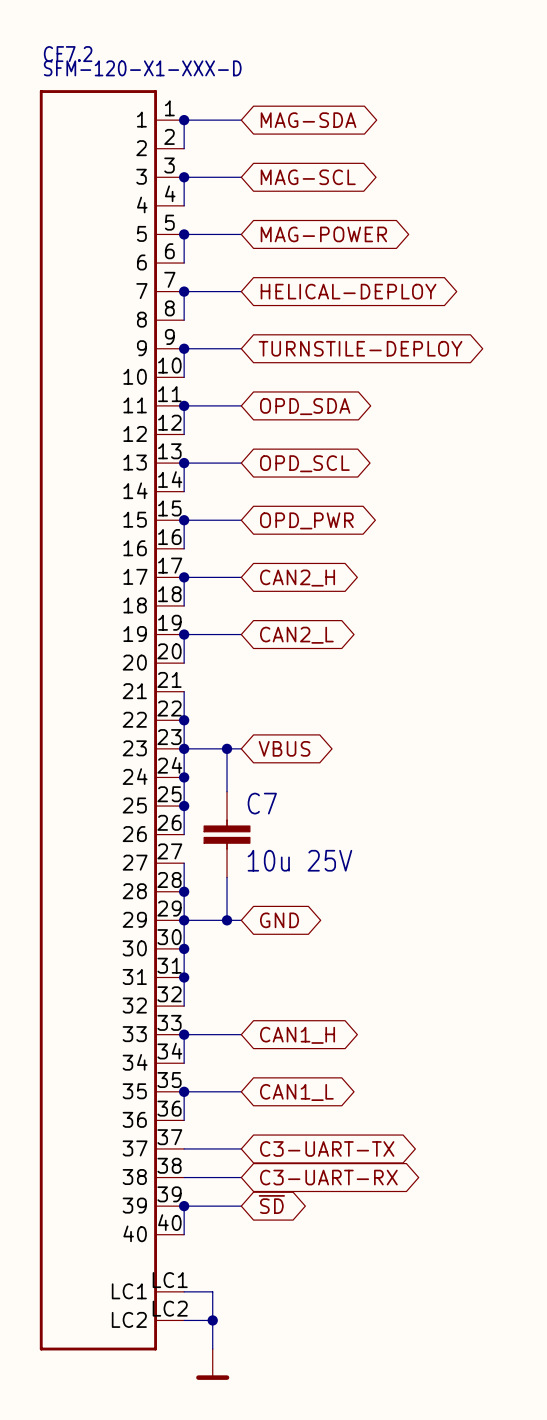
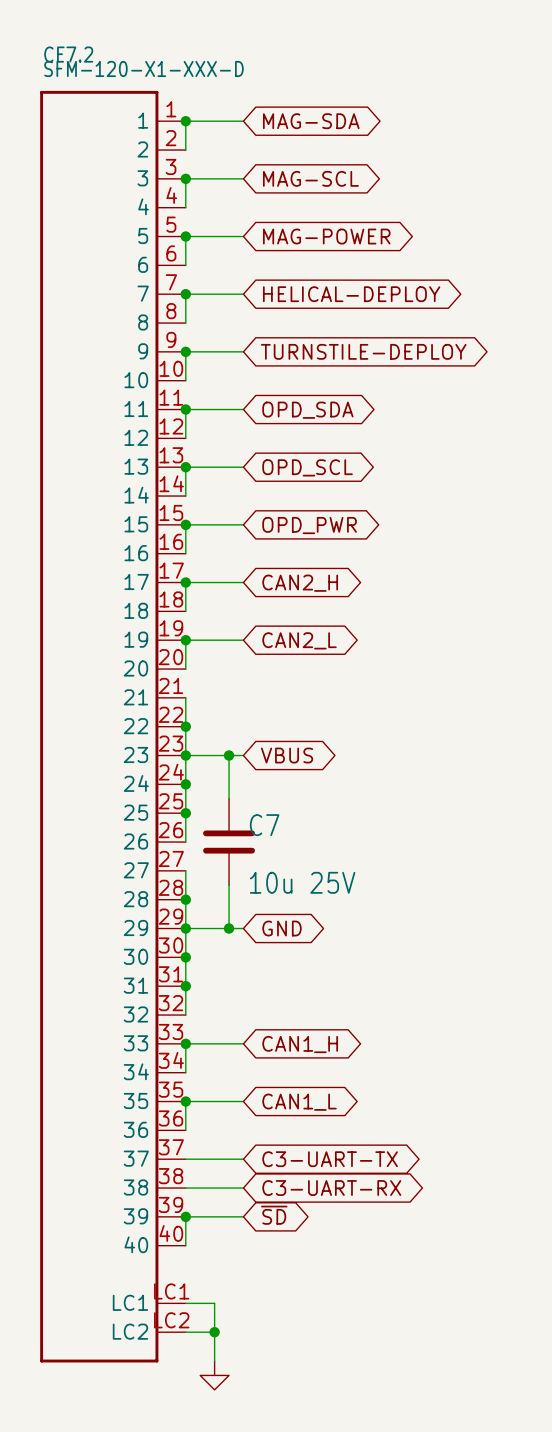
C7 symbol: [204, 791, 250, 878] -> [203, 798, 255, 886]
C7 name position: C7 (262, 803) -> C7 (264, 825)
C7 value position: 10u 25V (299, 860) -> 10u 25V (302, 882)
power symbol shape: [196, 1349, 230, 1380] -> [200, 1361, 230, 1390]

